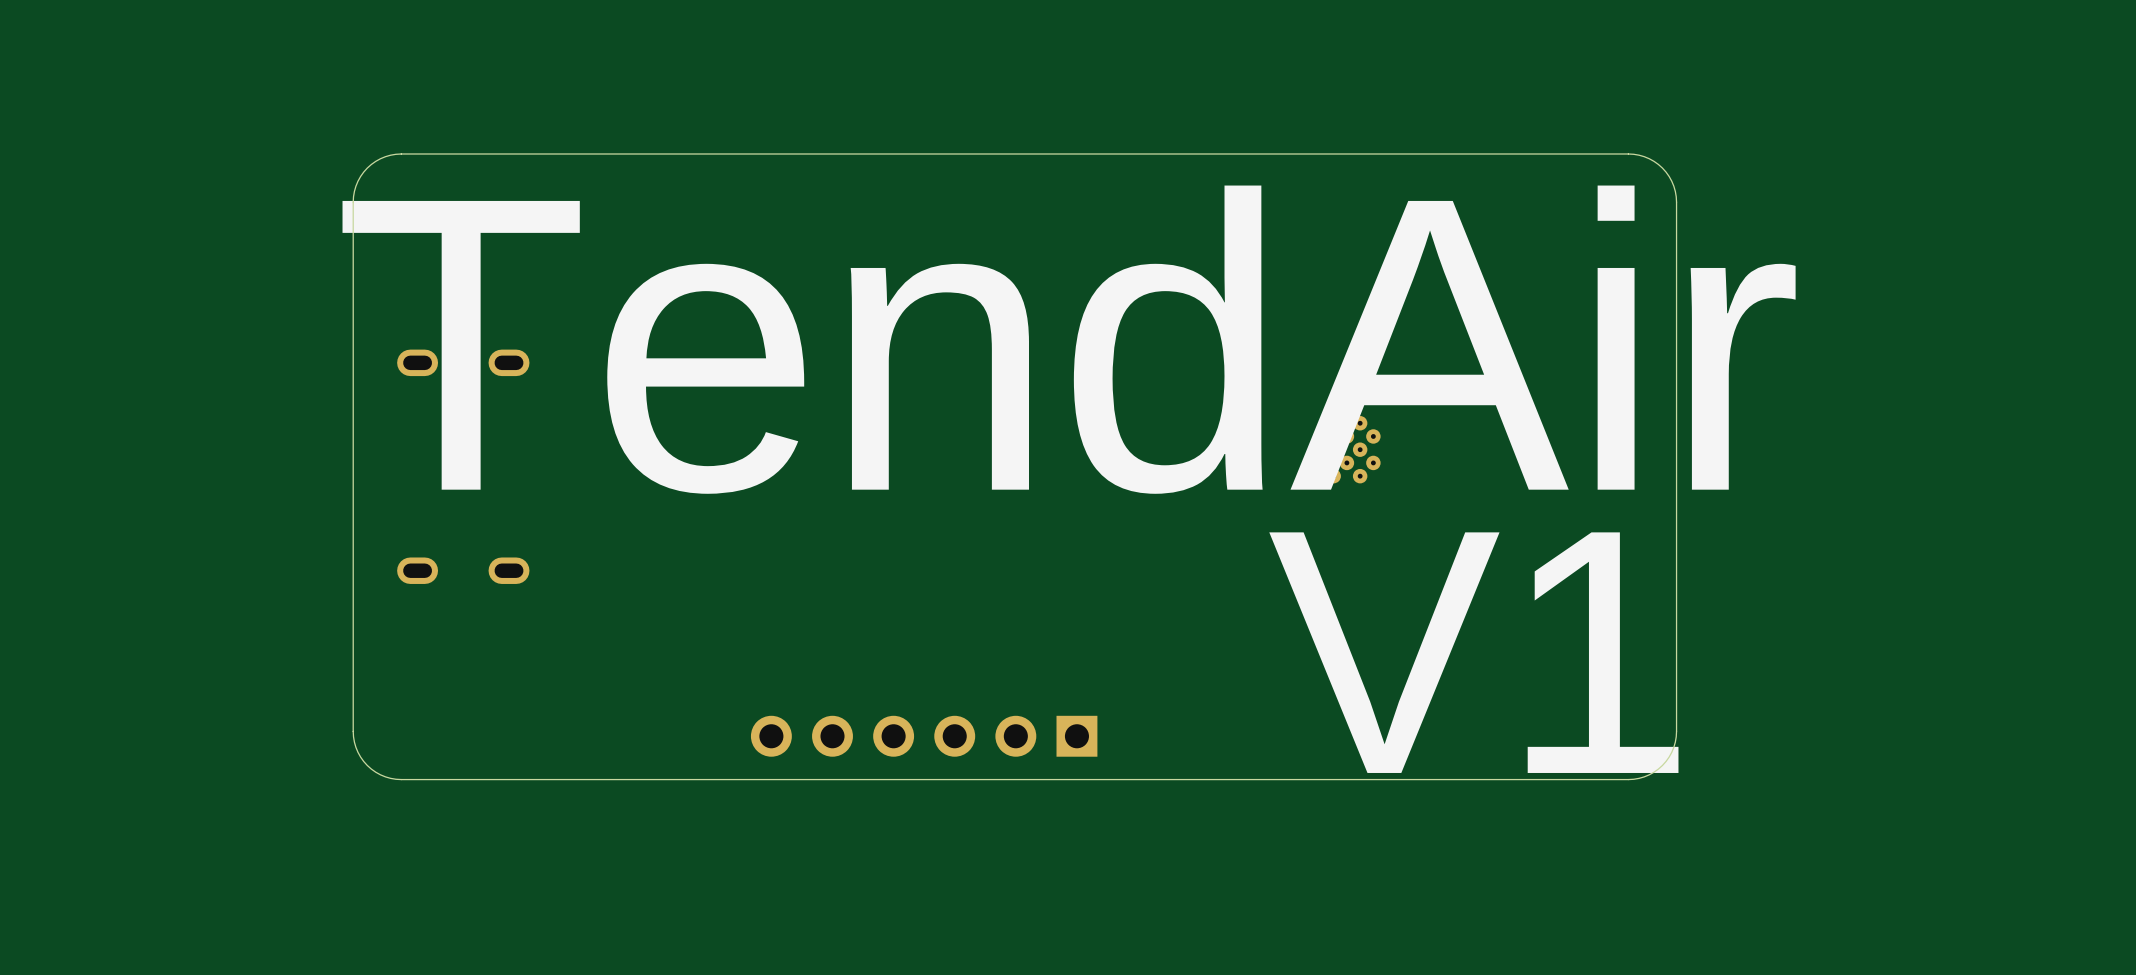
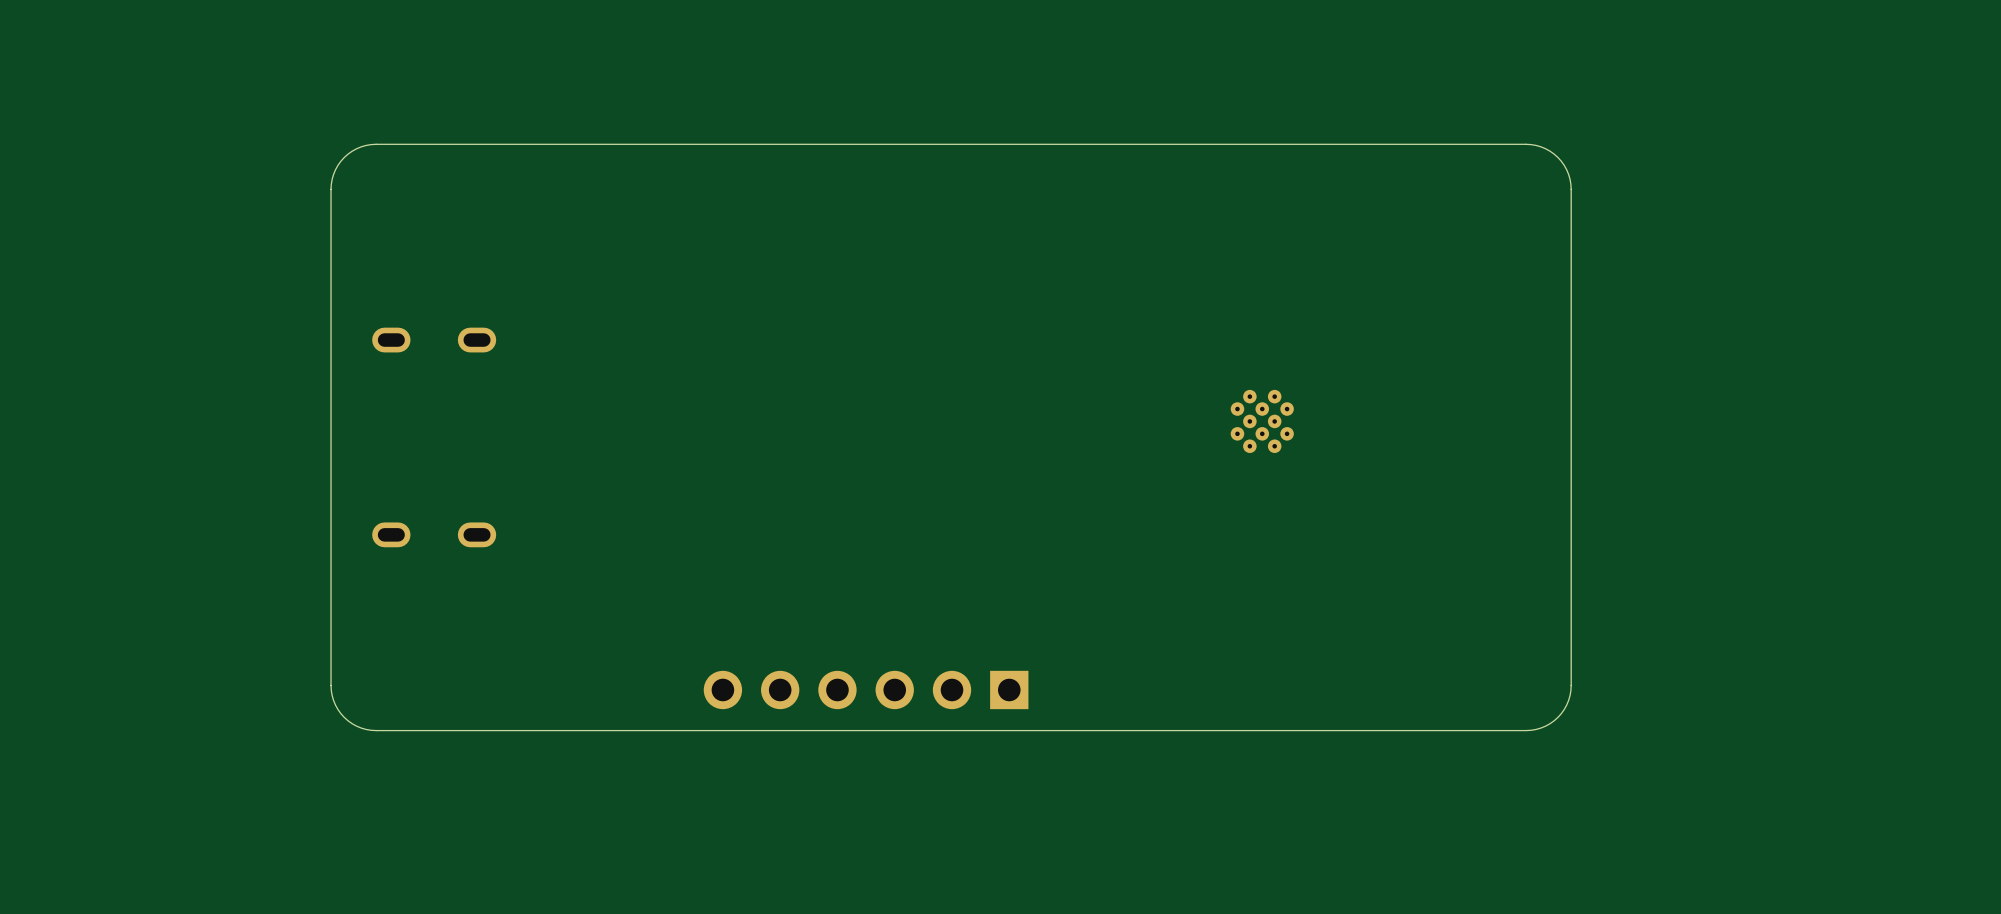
text: TendAir (1069, 339) -> none
text: V1 (1473, 652) -> none

